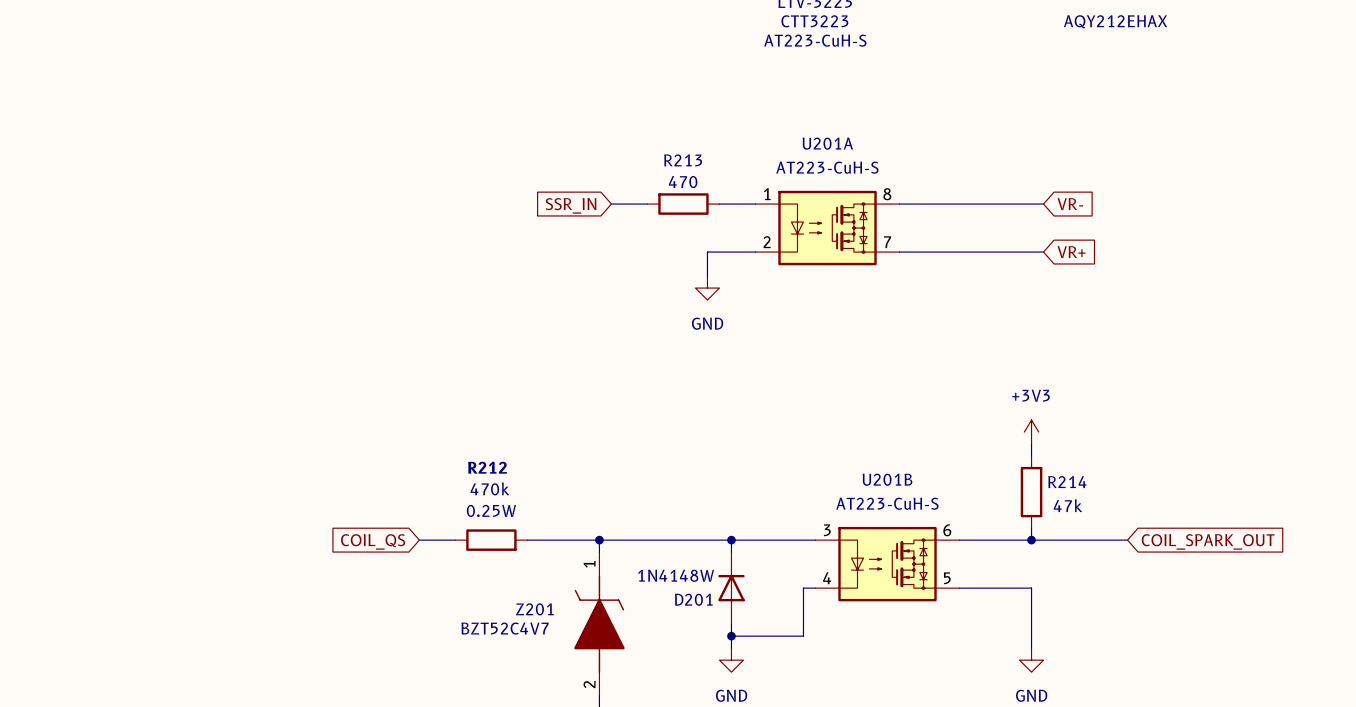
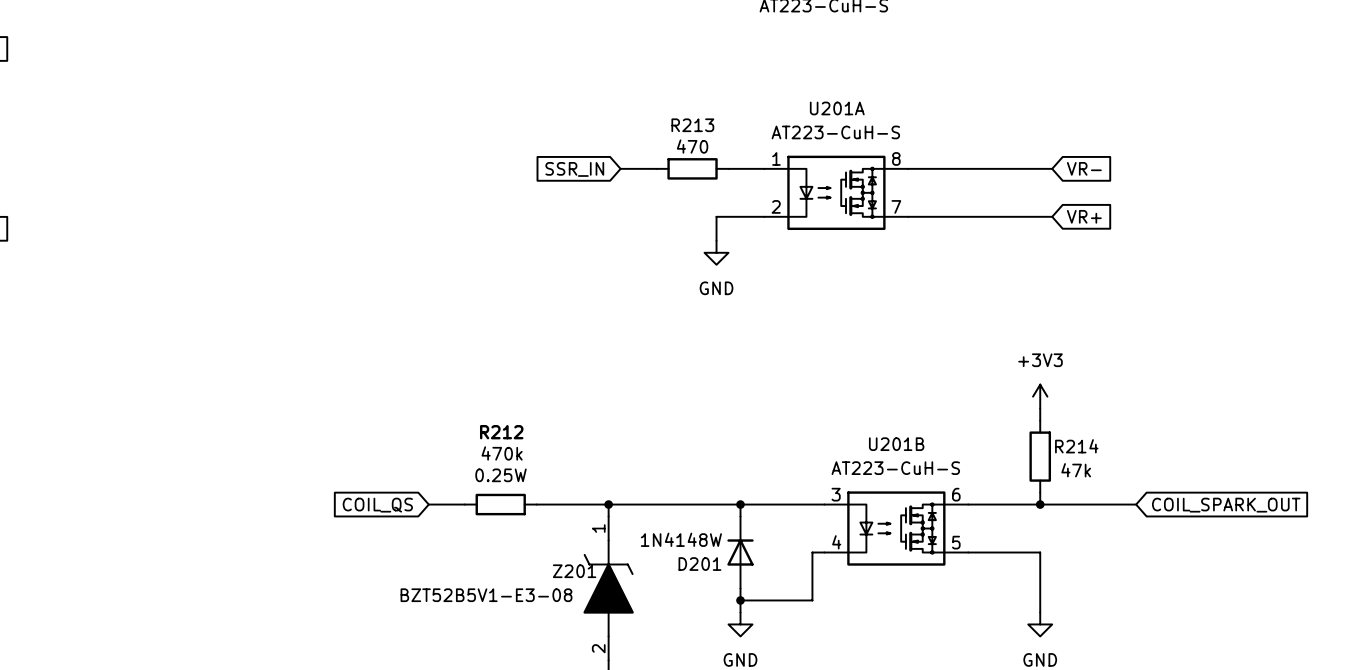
Z201 name position: Z201 (534, 609) -> Z201 (574, 571)
Z201 value: BZT52C4V7 (505, 628) -> BZT52B5V1-E3-08 (486, 595)

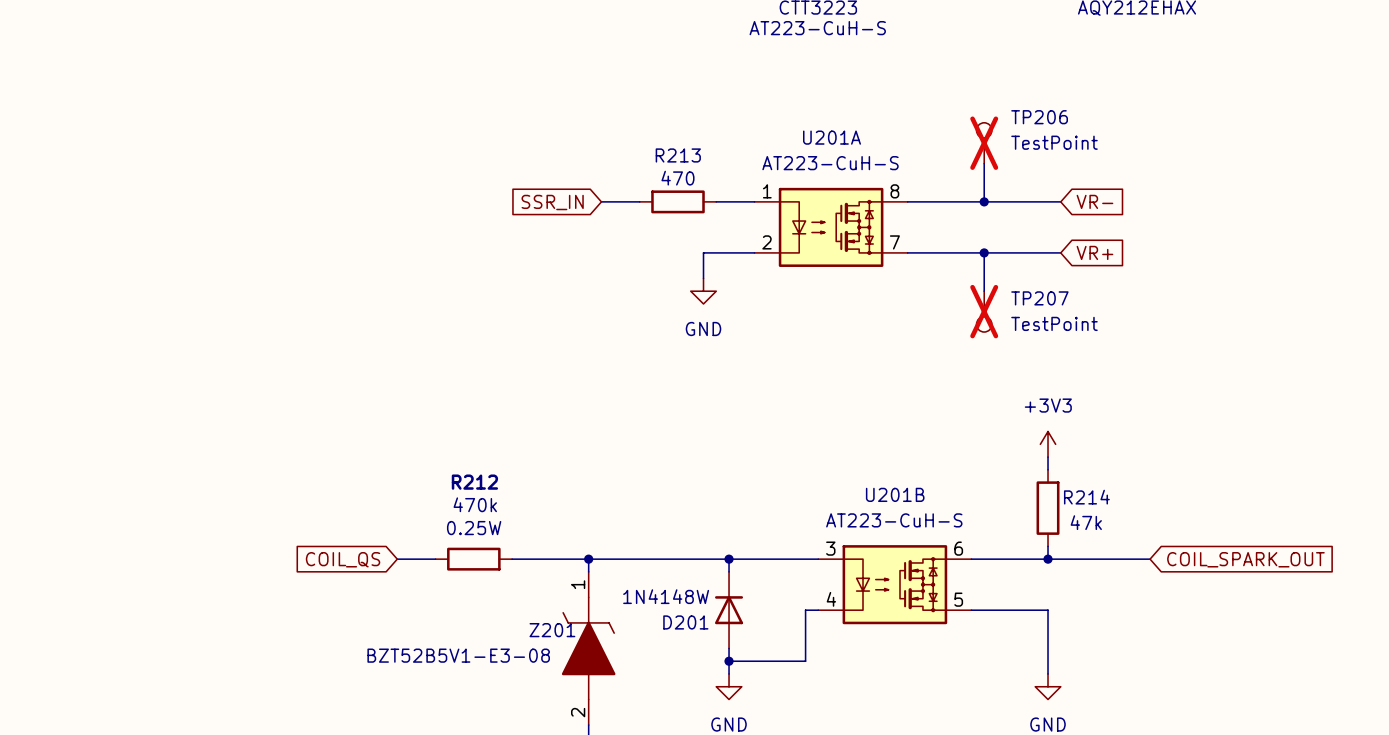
TP206: none -> TestPoint (984, 143)
wire: none -> (984, 163) (984, 201)
junction: none -> (984, 201)
wire: none -> (984, 252) (984, 291)
junction: none -> (984, 252)
TP207: none -> TestPoint (984, 311)

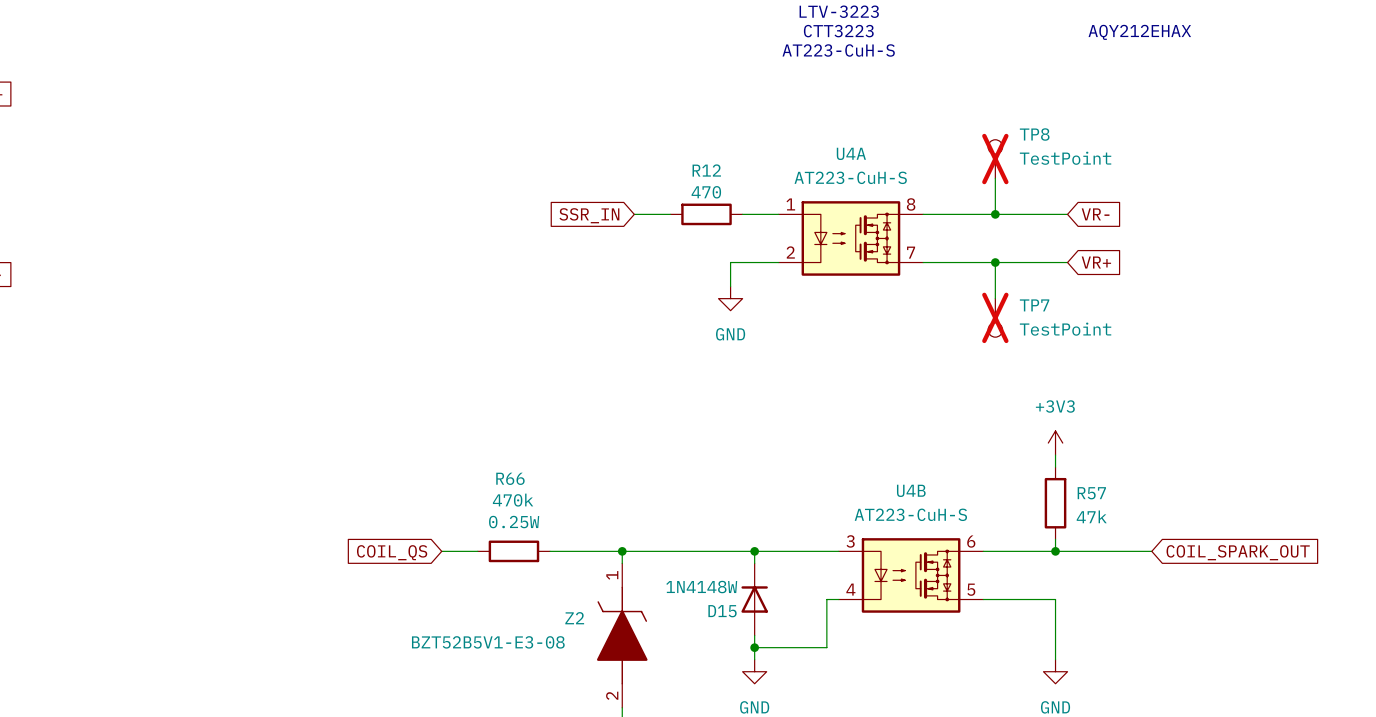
TP206 name: TP206 (1039, 117) -> TP8 (1034, 134)
U201A name: U201A (832, 137) -> U4A (851, 153)
R213 name: R213 (678, 155) -> R12 (706, 170)
TP207 name: TP207 (1039, 298) -> TP7 (1034, 305)
R212 name: R212 (474, 482) -> R66 (510, 478)
U201B name: U201B (895, 494) -> U4B (911, 490)
R214 name: R214 (1086, 497) -> R57 (1091, 493)
D201 name: D201 (685, 622) -> D15 (722, 611)
Z201 name: Z201 (552, 630) -> Z2 (574, 618)

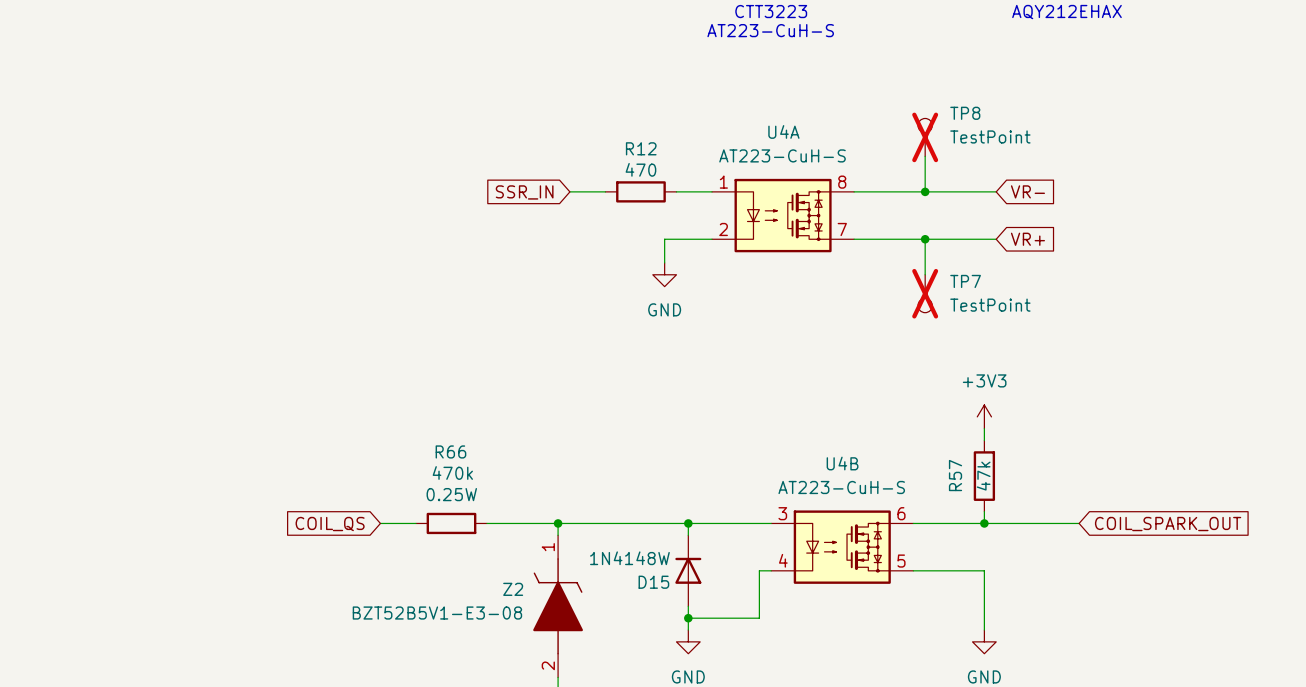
R57 name rotation: 0° (1091, 493) -> 90° counterclockwise (955, 475)
R57 name position: R57 (1091, 493) -> R57 (955, 475)
R57 value rotation: 0° (1091, 516) -> 90° counterclockwise (983, 476)

